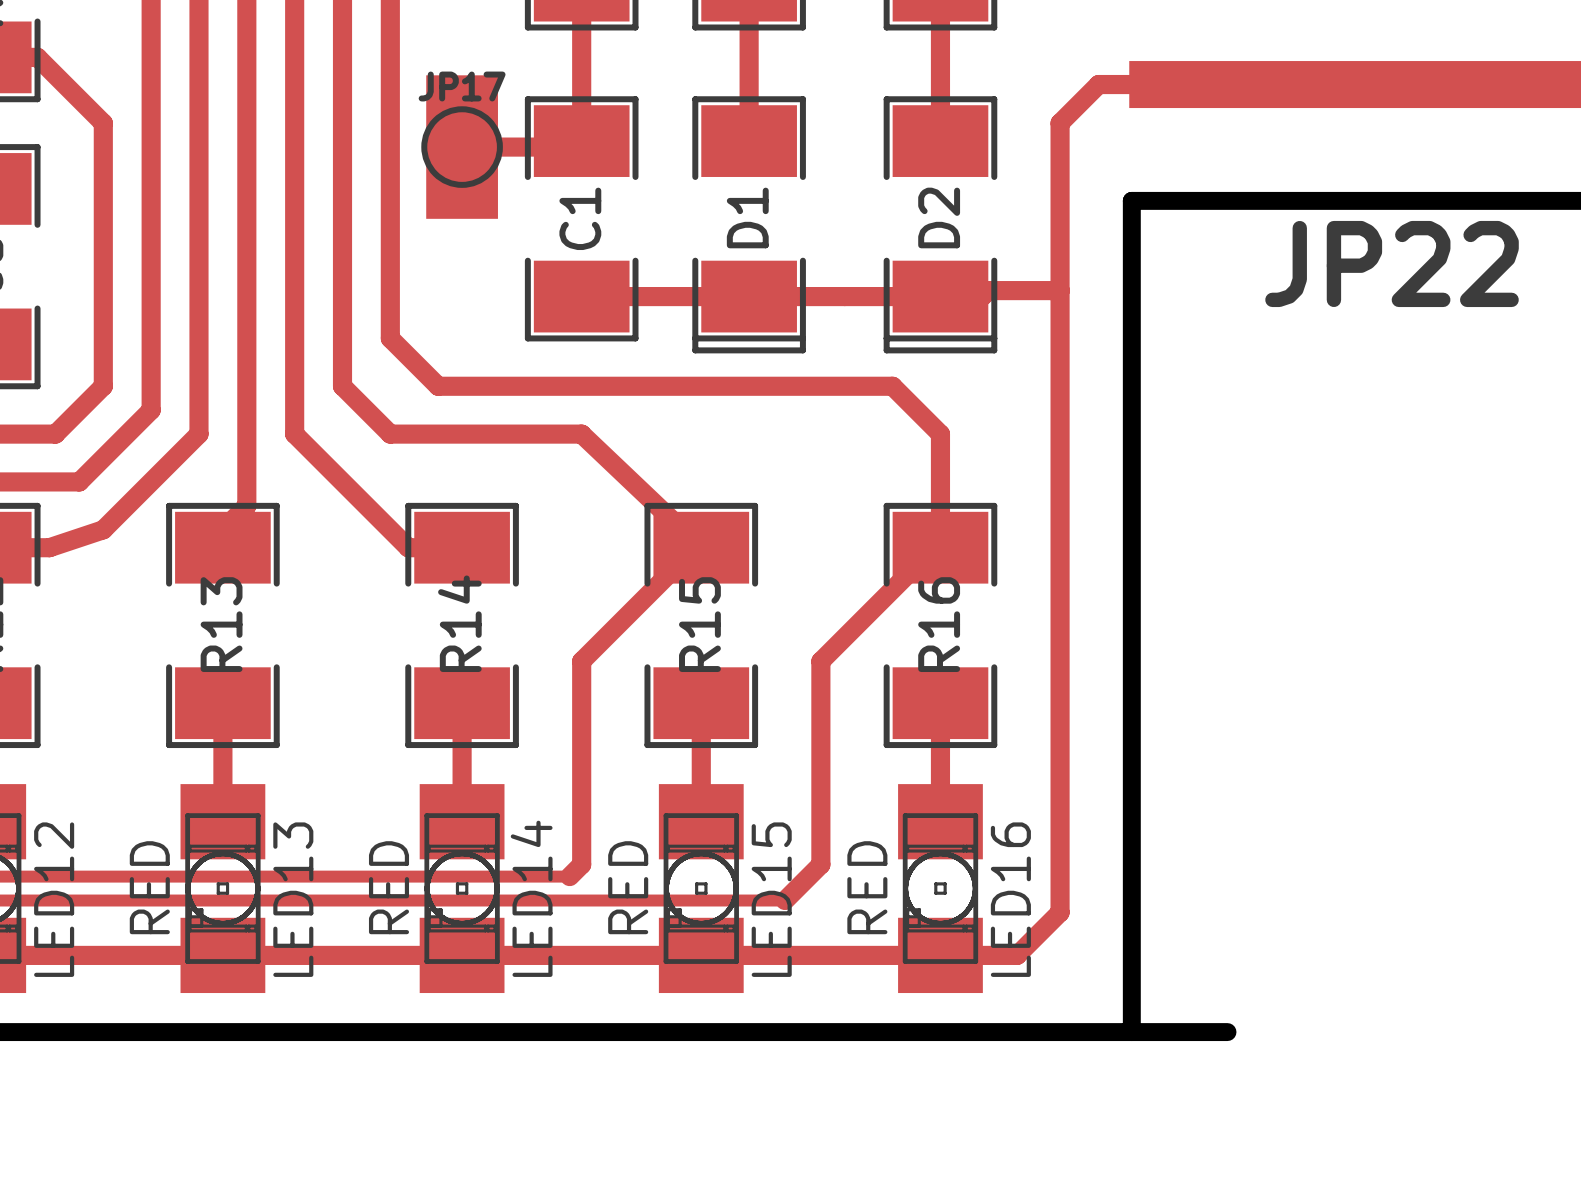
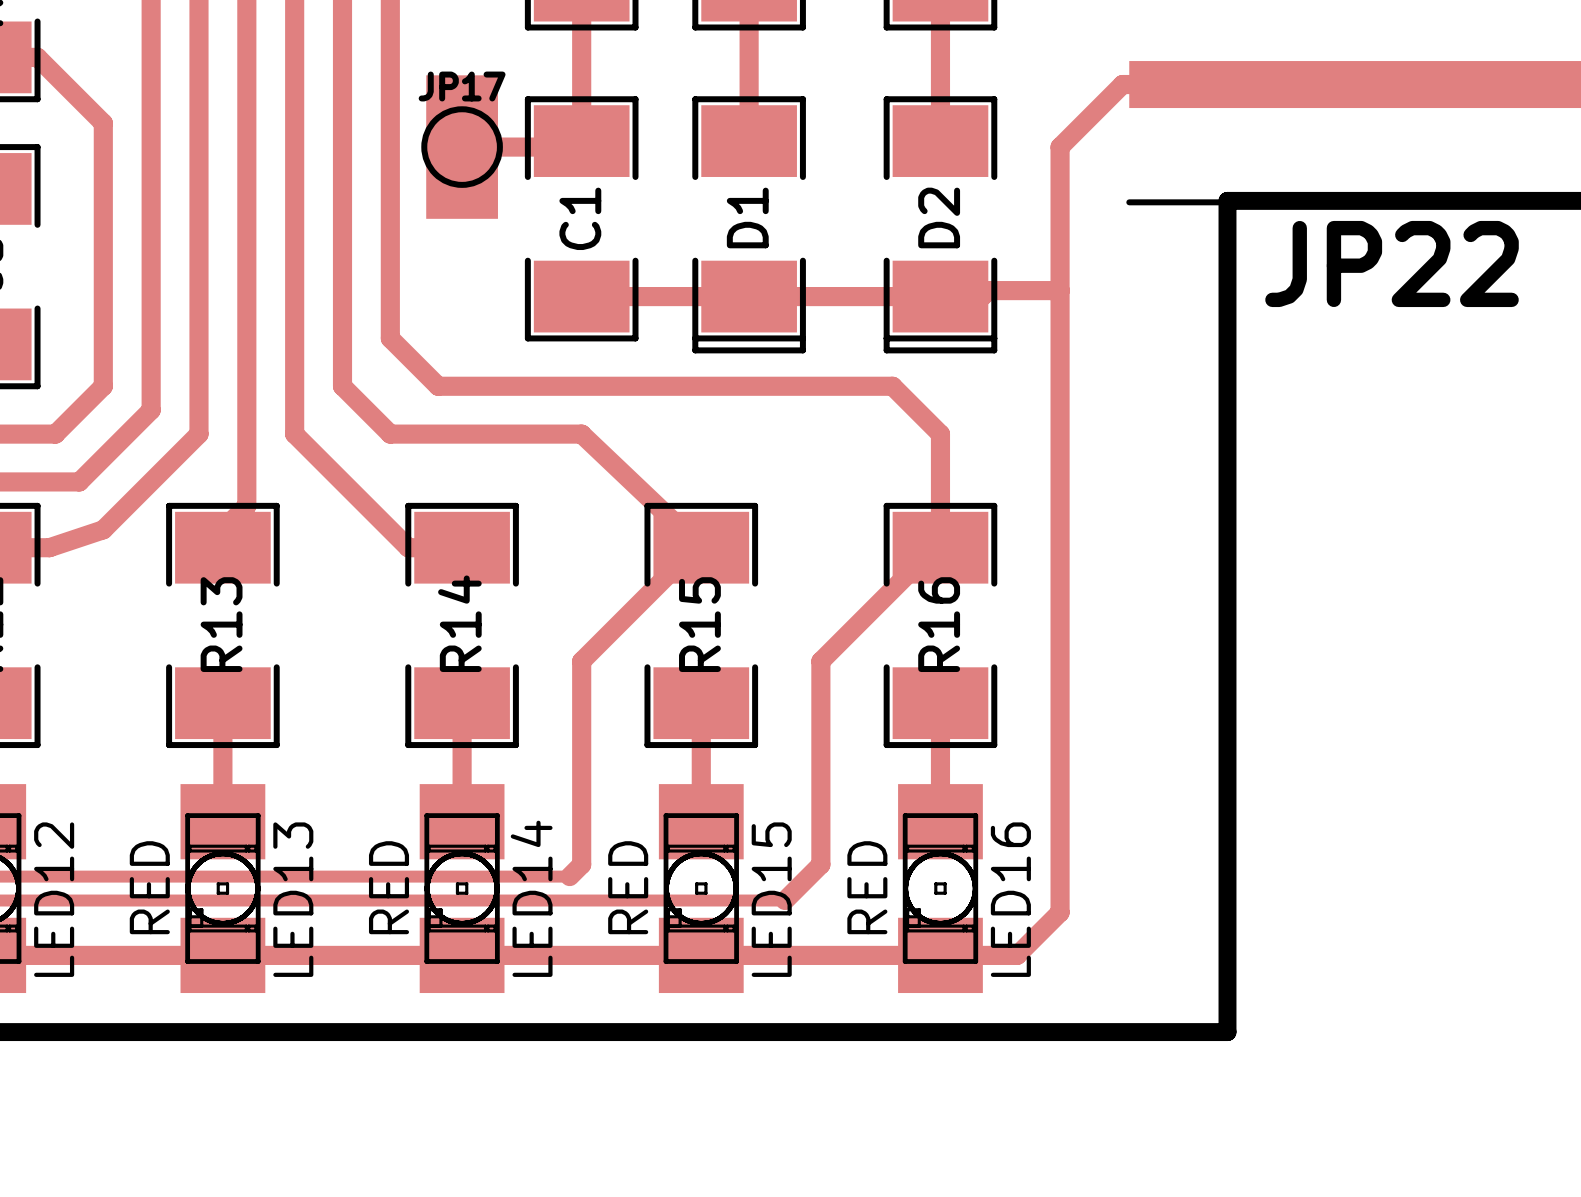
top track: (1122, 84) (1098, 84) (1060, 123) (1060, 147) -> (1122, 84) (1060, 147)
board edge: (1227, 200) (1131, 200) (1131, 1032) -> (1227, 200) (1227, 1032)

